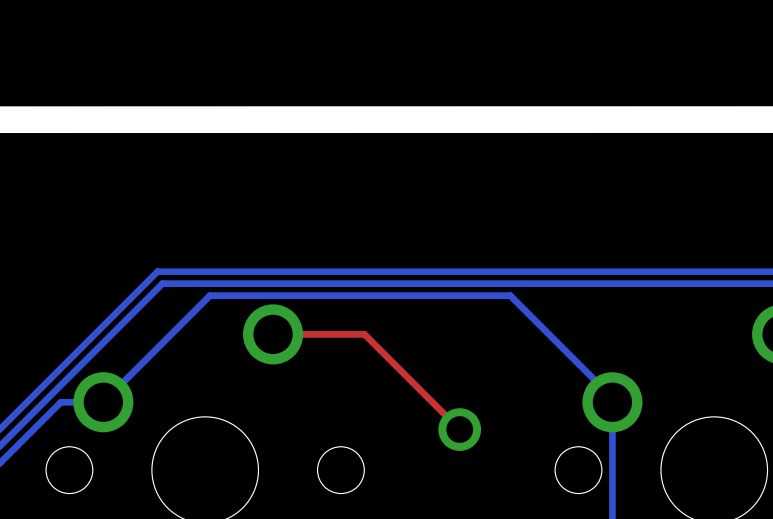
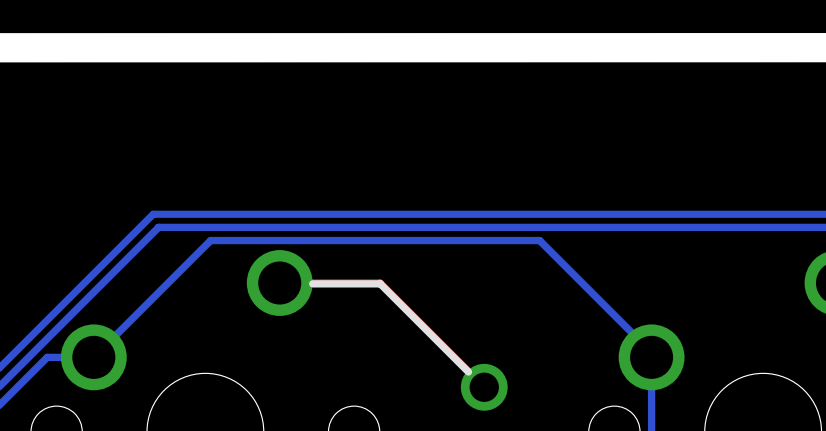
line: none -> (312, 283) (380, 283) (468, 371)

